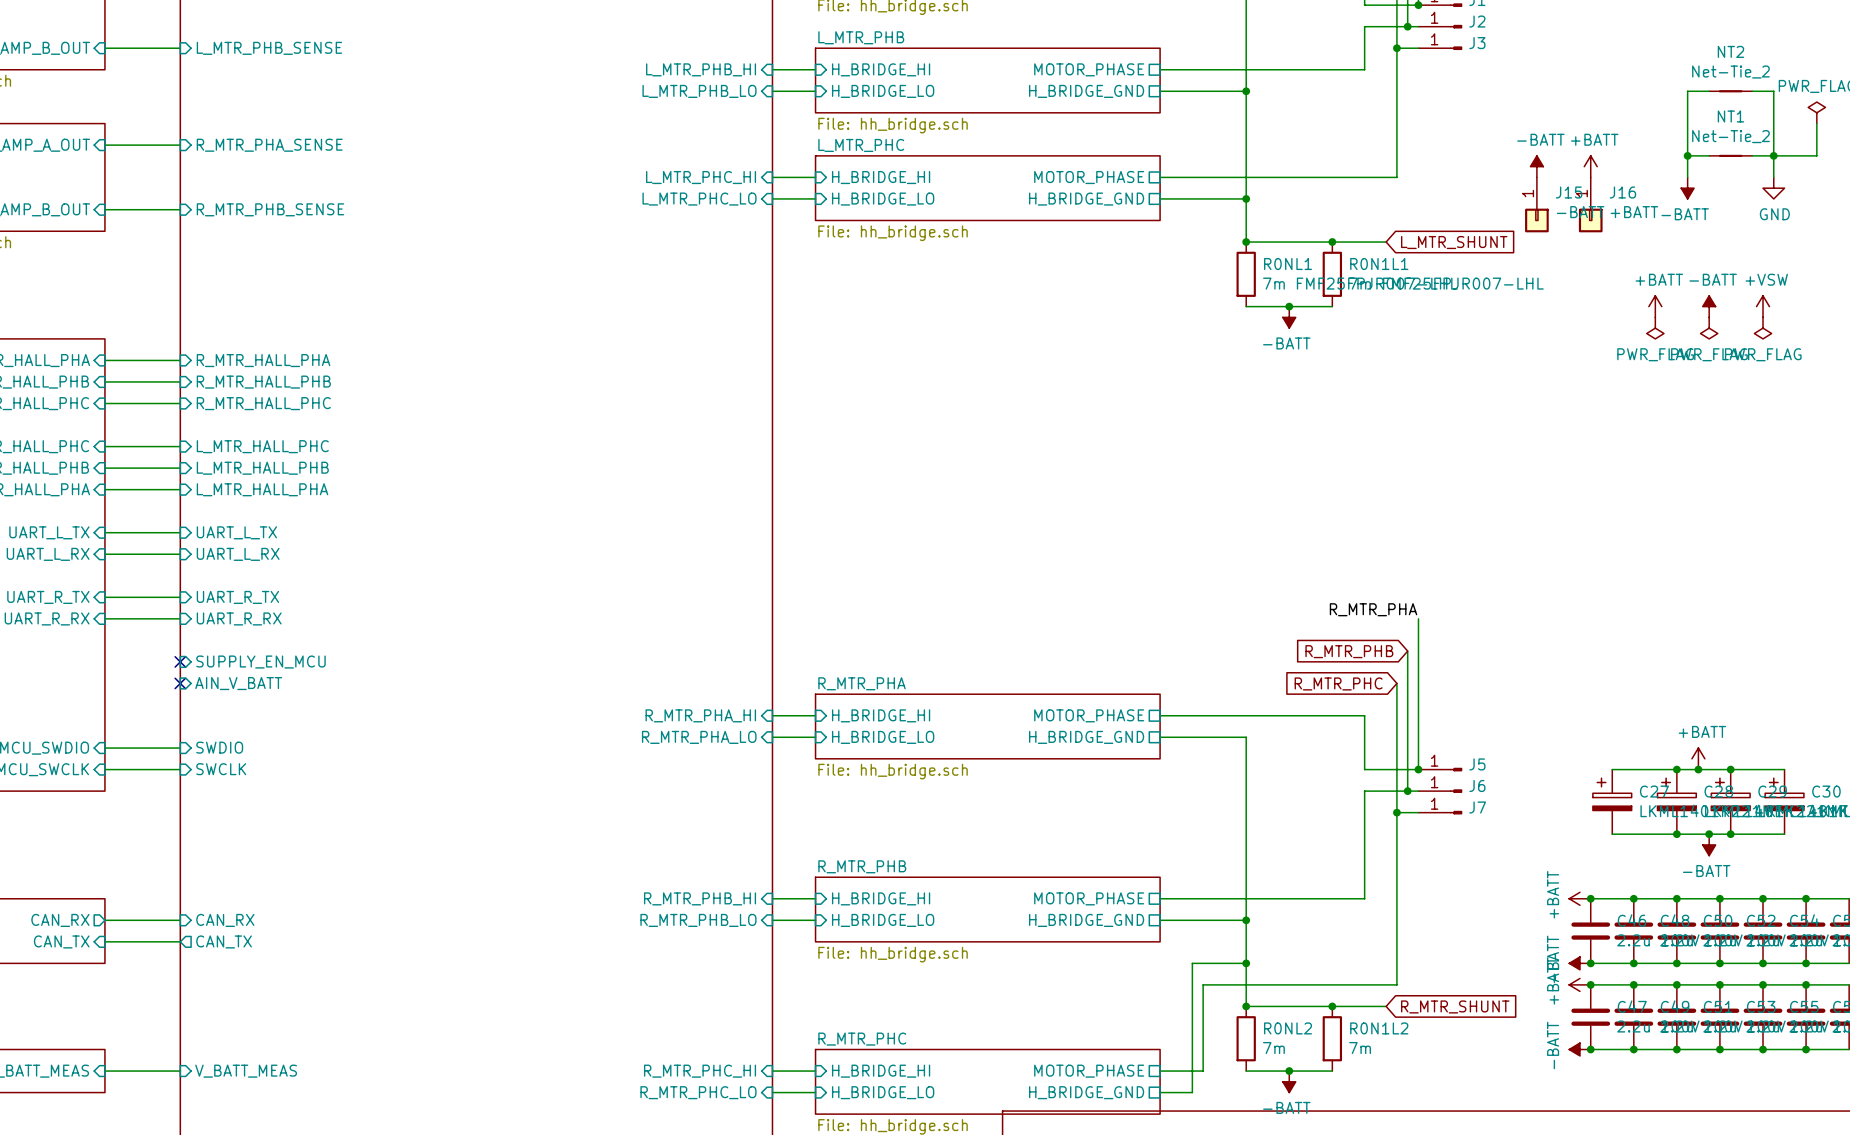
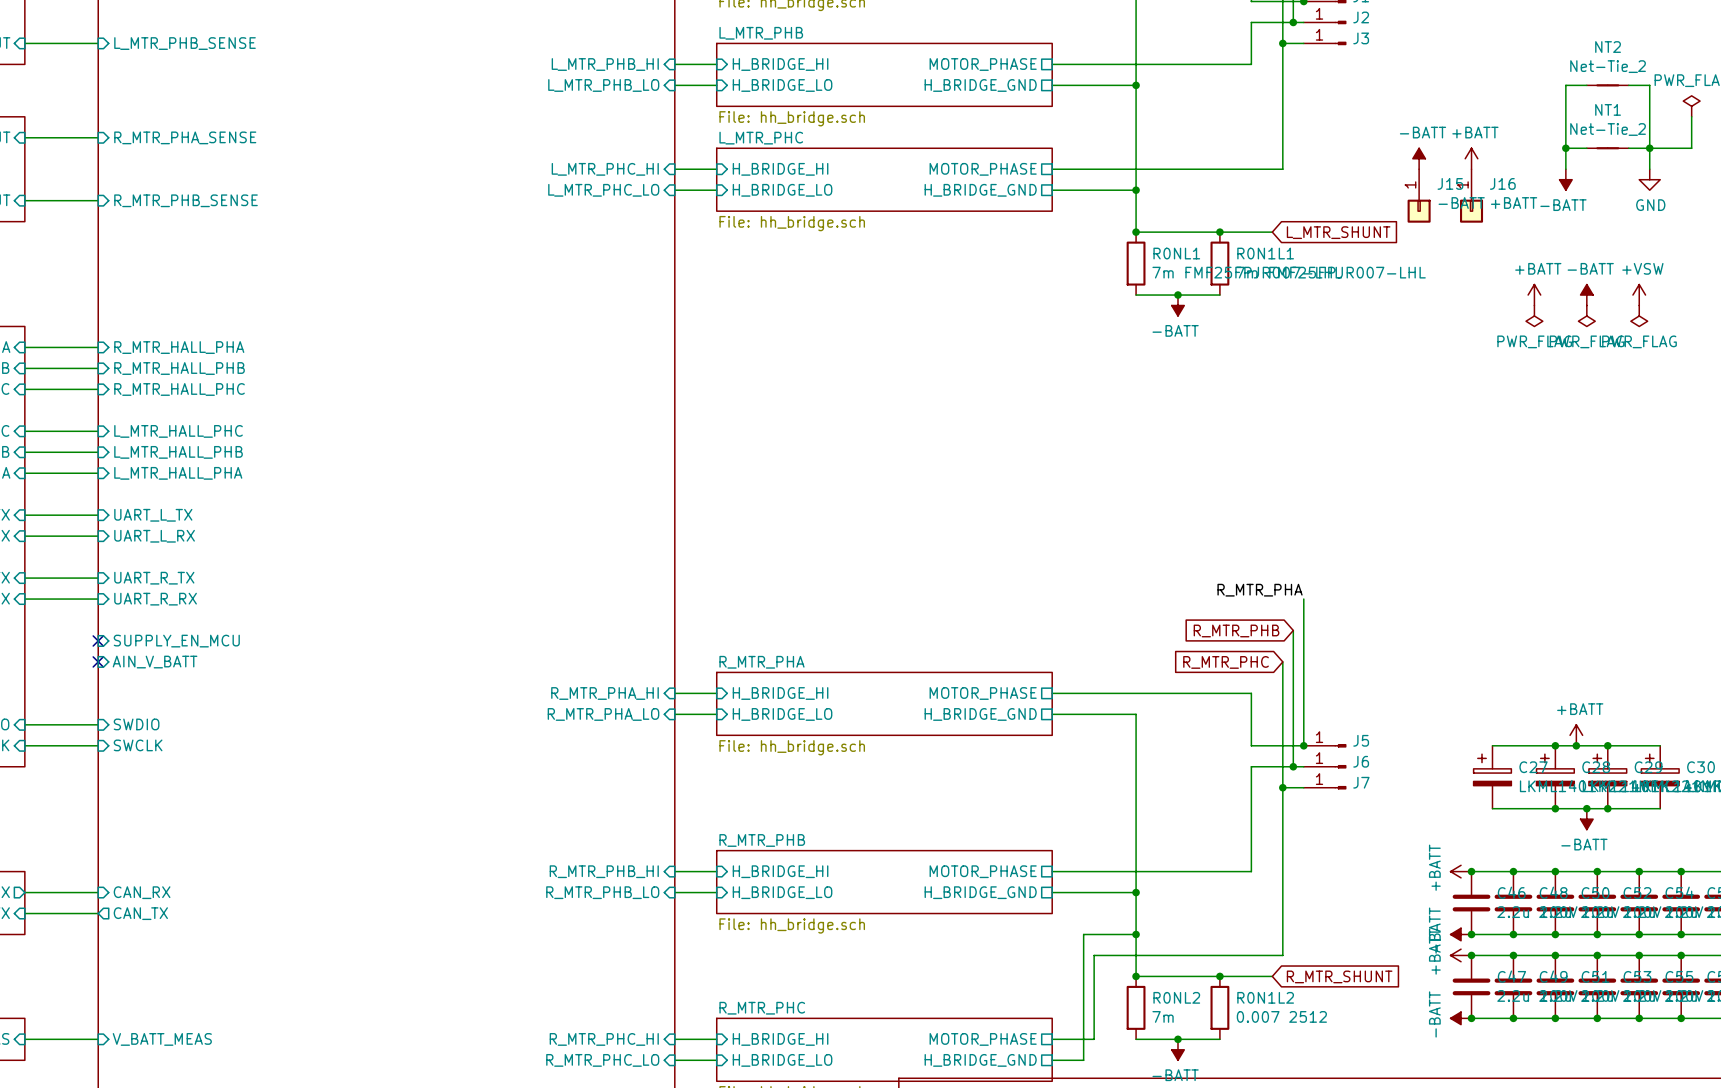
R0N1L2 value: 7m (1360, 1048) -> 0.007 2512 (1281, 1016)

